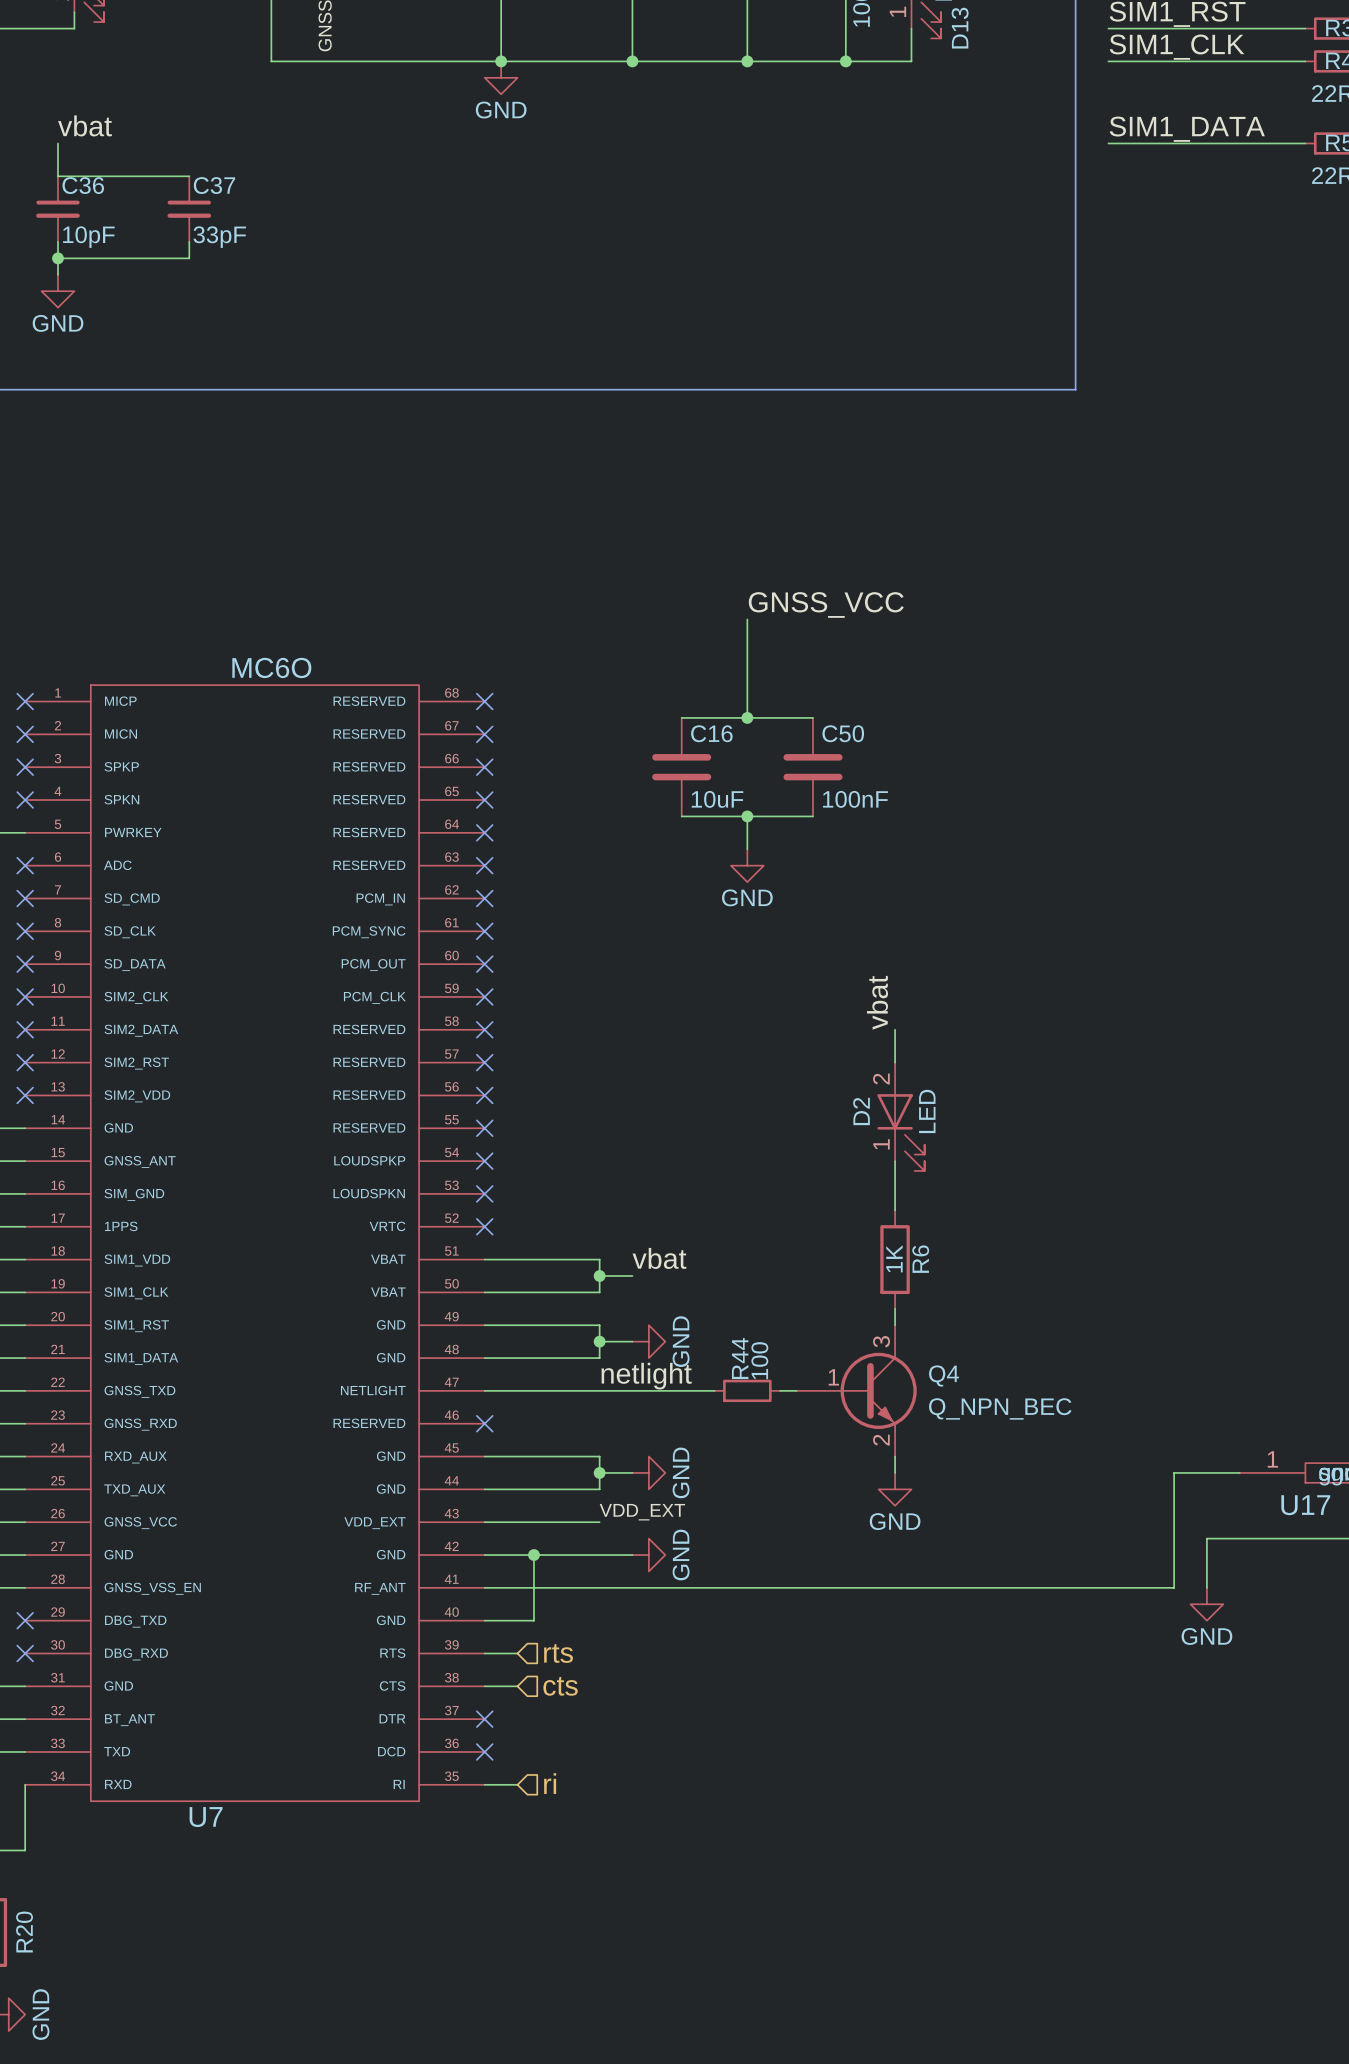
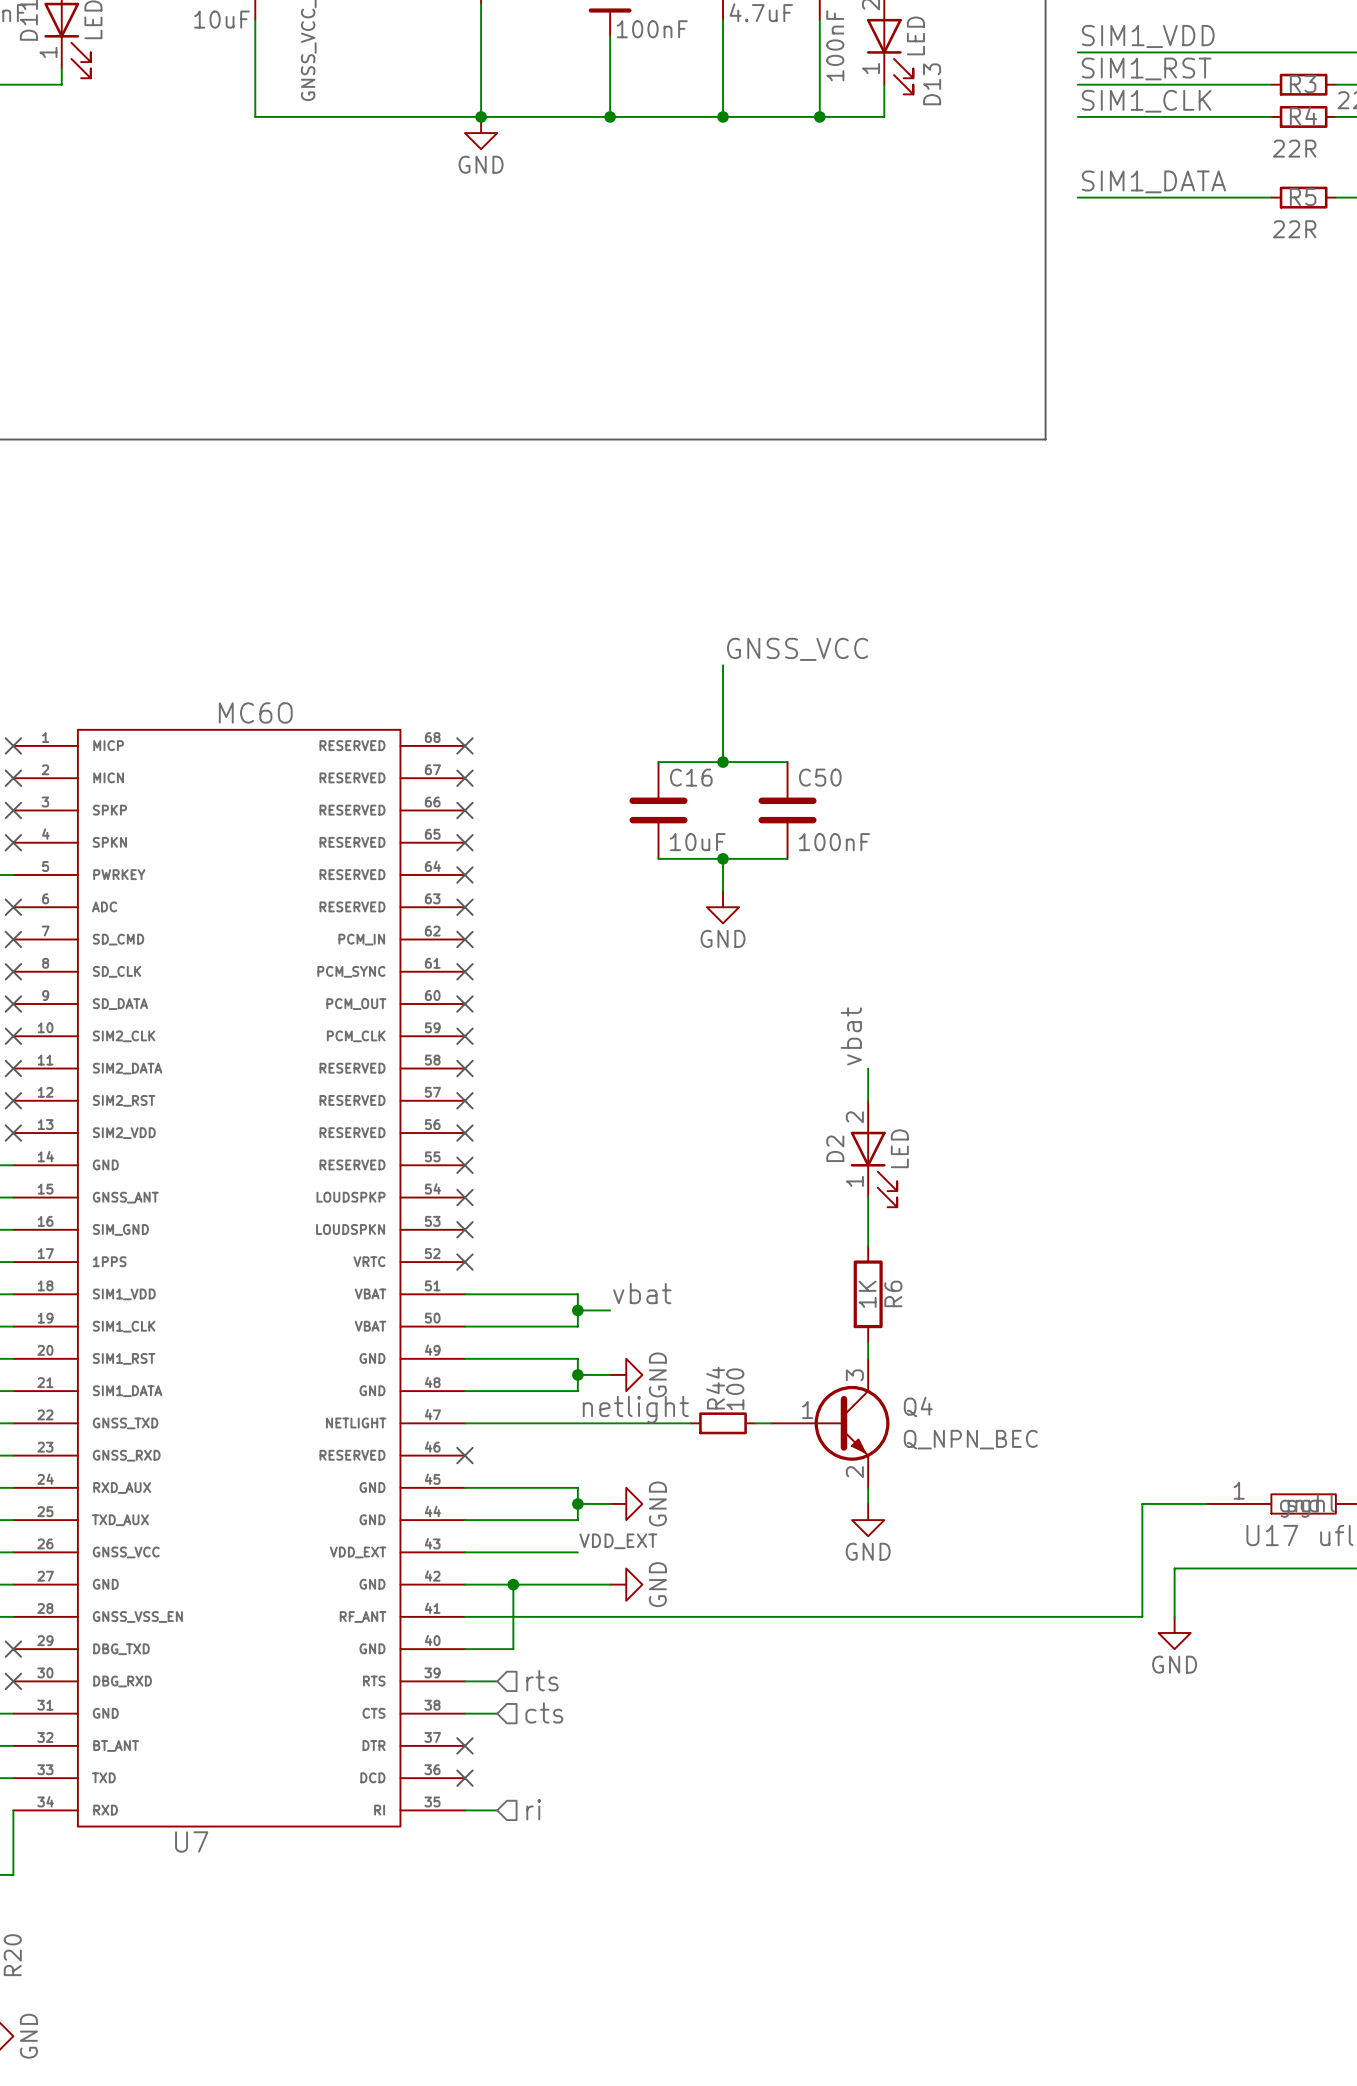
label: vbat (84, 125) -> none
wire: (57, 143) (57, 176) (189, 176) -> none
C36: 10pF (57, 209) -> none
C37: 33pF (189, 209) -> none
wire: (57, 241) (57, 274) -> none
wire: (189, 241) (189, 258) (57, 258) -> none
junction: (57, 258) -> none
power symbol: GND (57, 291) -> none

